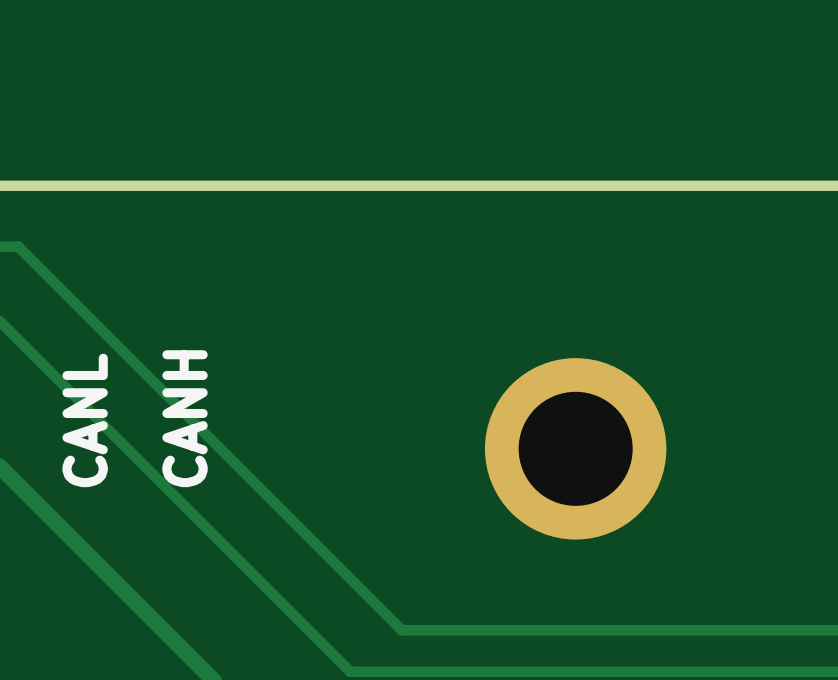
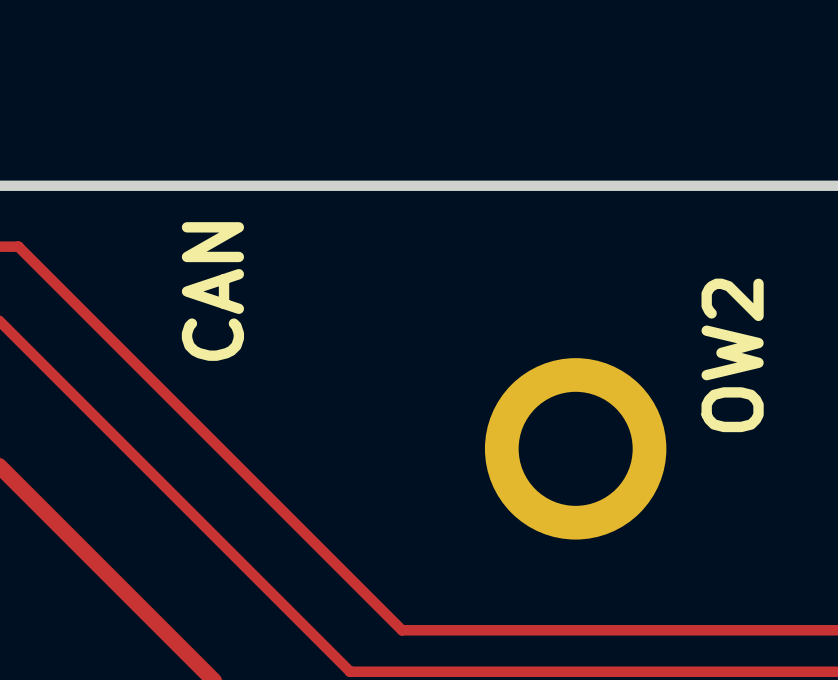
text: none -> OW2 (732, 355)
text: CANH (185, 418) -> CAN (212, 291)
text: CANL (85, 420) -> none

